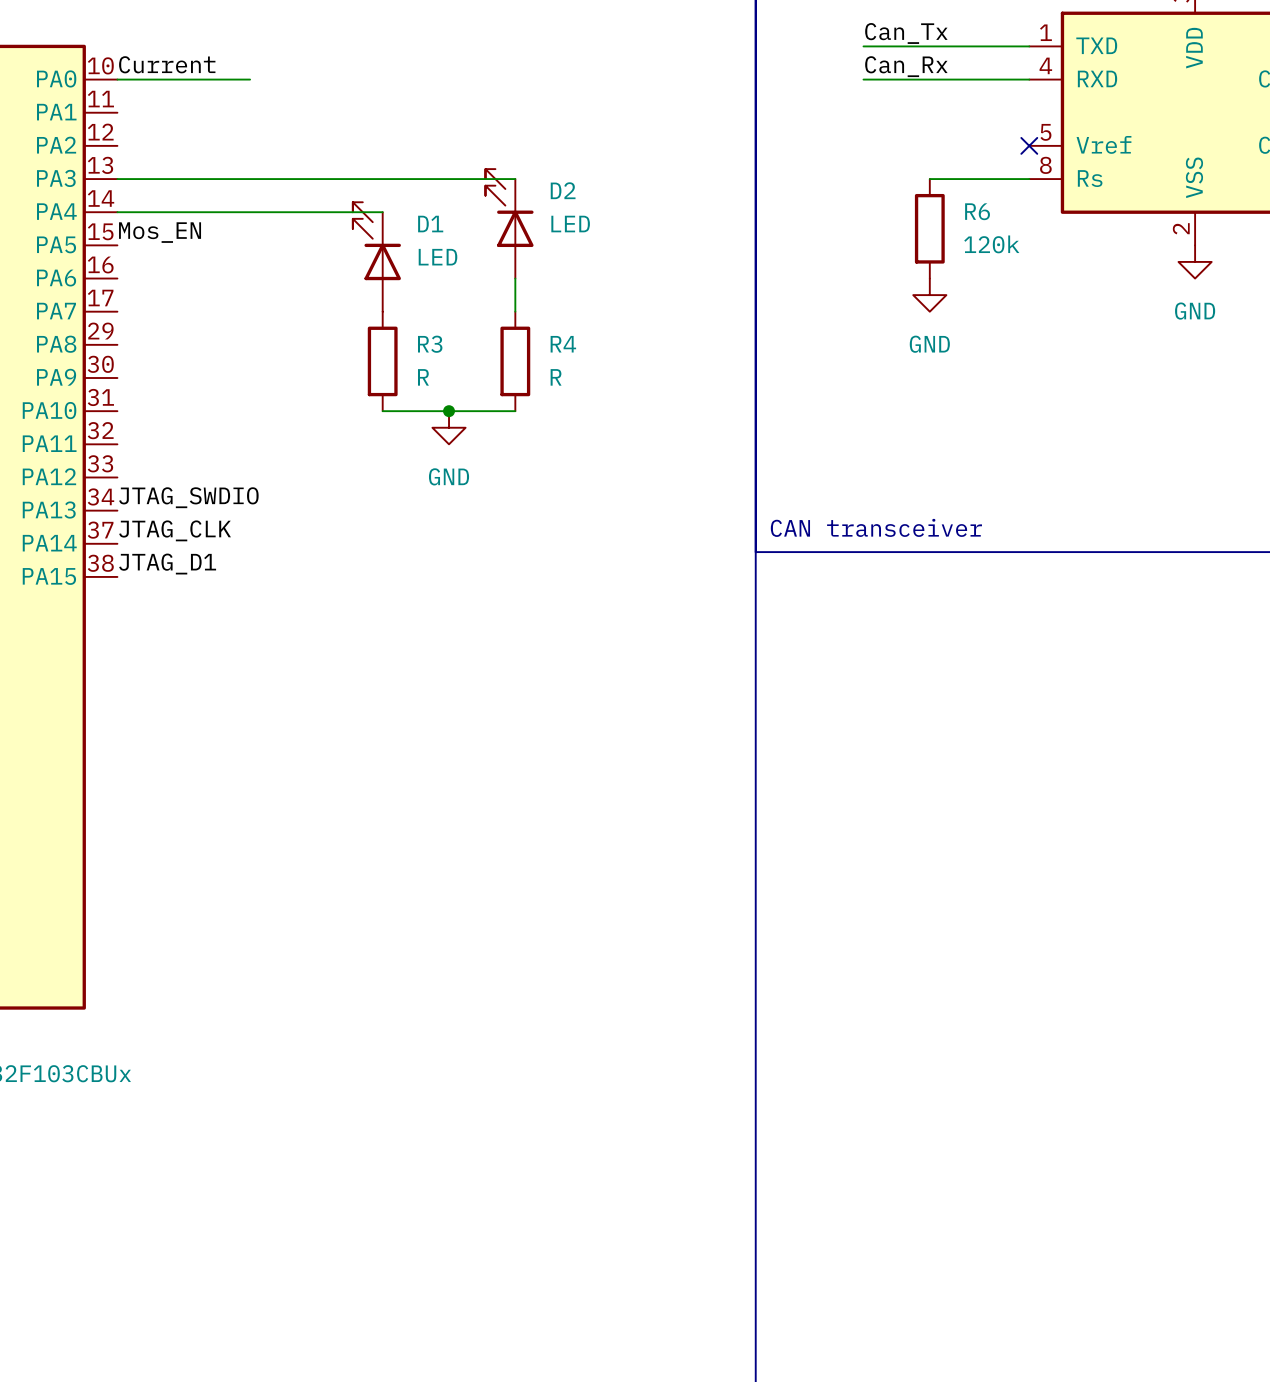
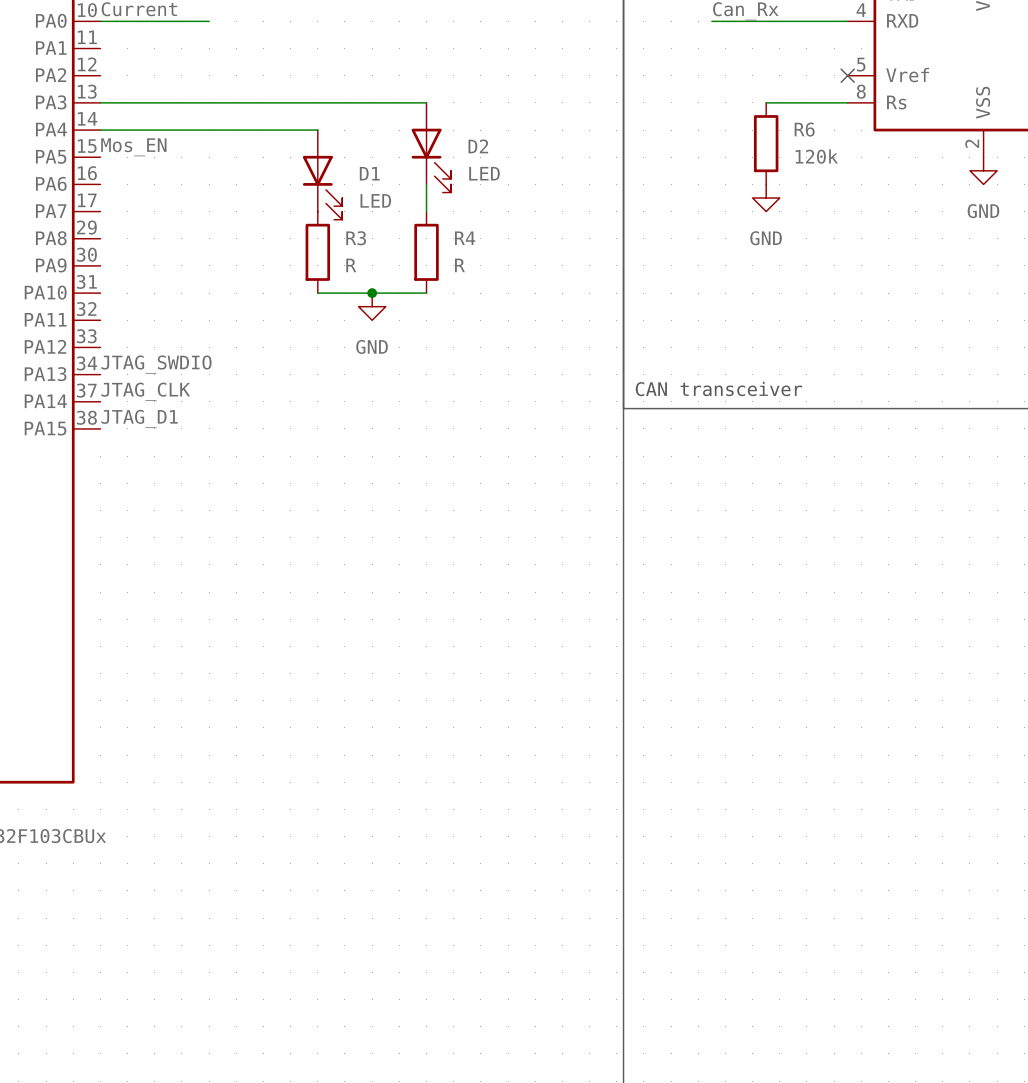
D2 name position: D2 (563, 190) -> D2 (478, 146)
D2 rotation: 0° (509, 208) -> 180° (431, 160)
D1 name position: D1 (430, 224) -> D1 (369, 173)
D2 value position: LED (570, 224) -> LED (484, 173)
D1 rotation: 0° (376, 241) -> 180° (322, 187)
D1 value position: LED (437, 257) -> LED (375, 200)

